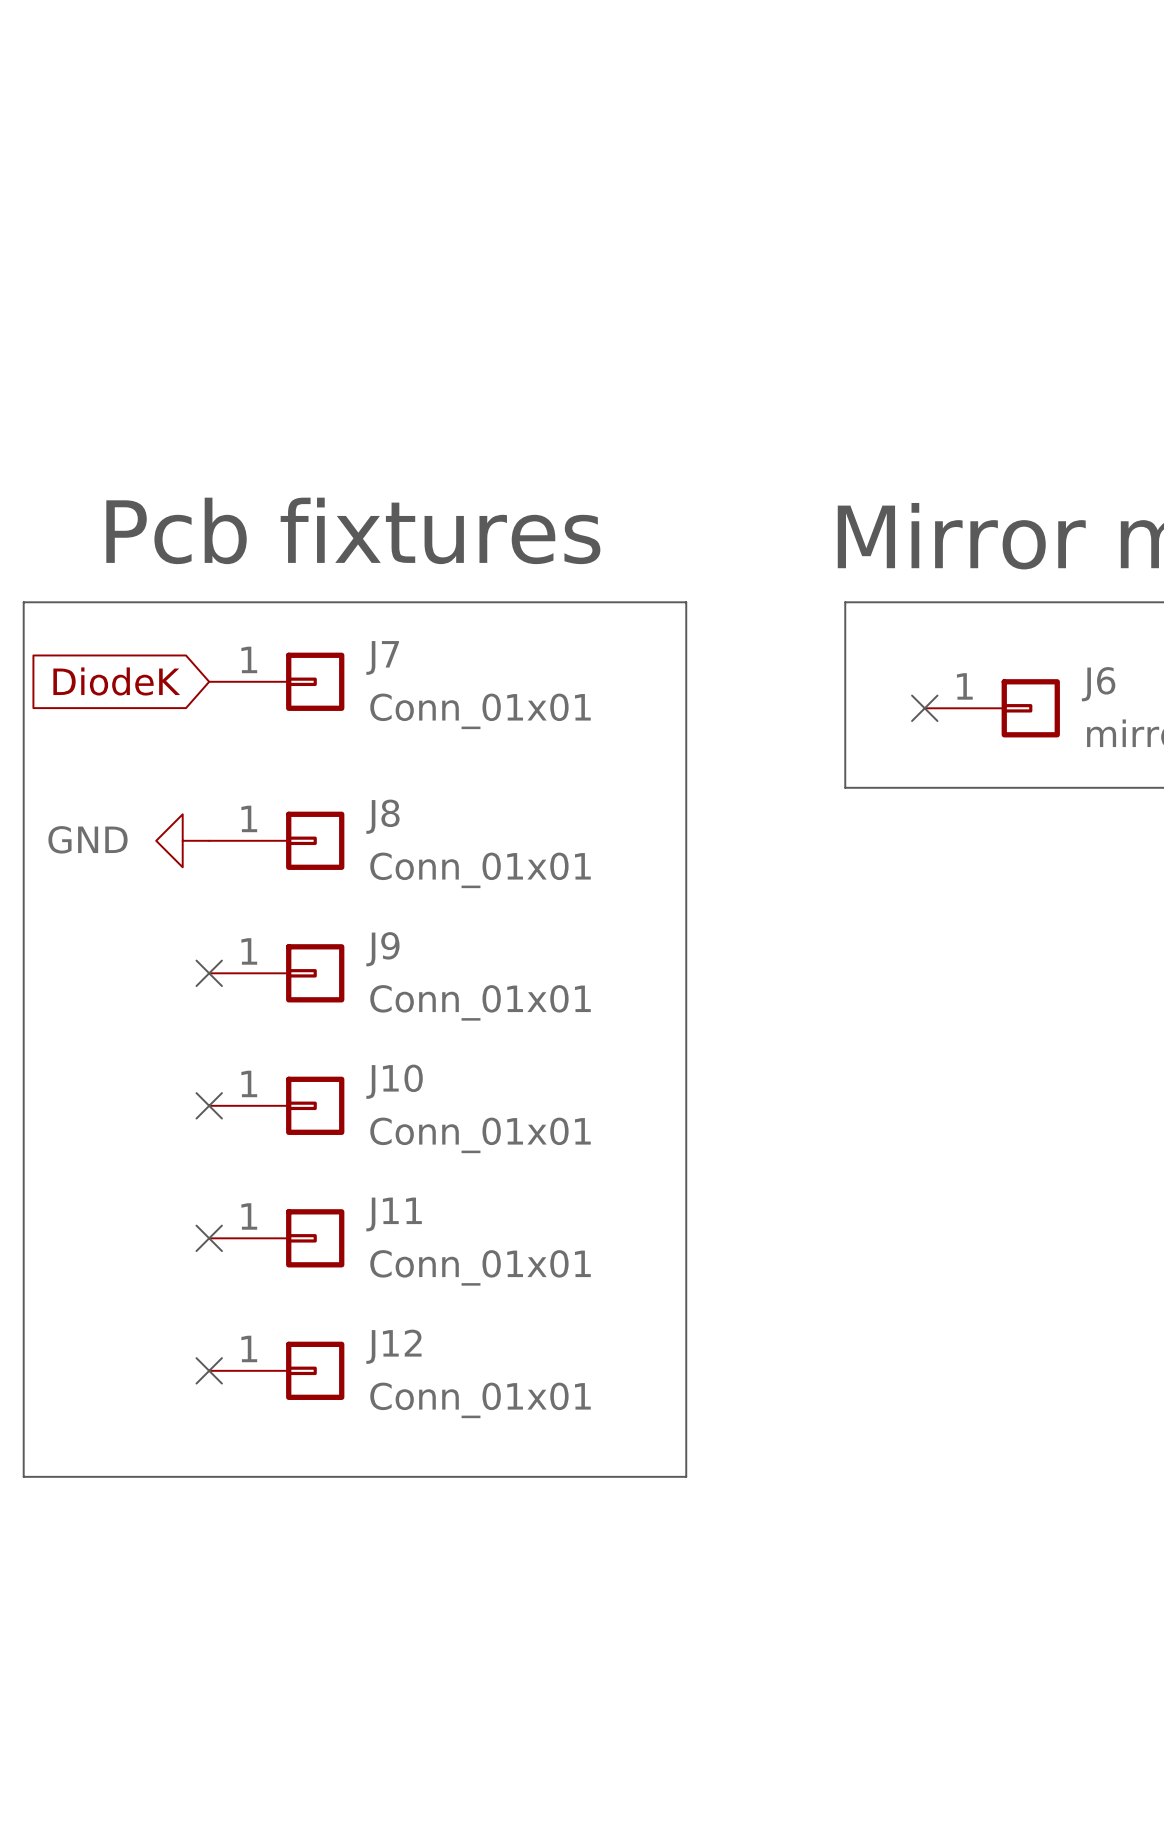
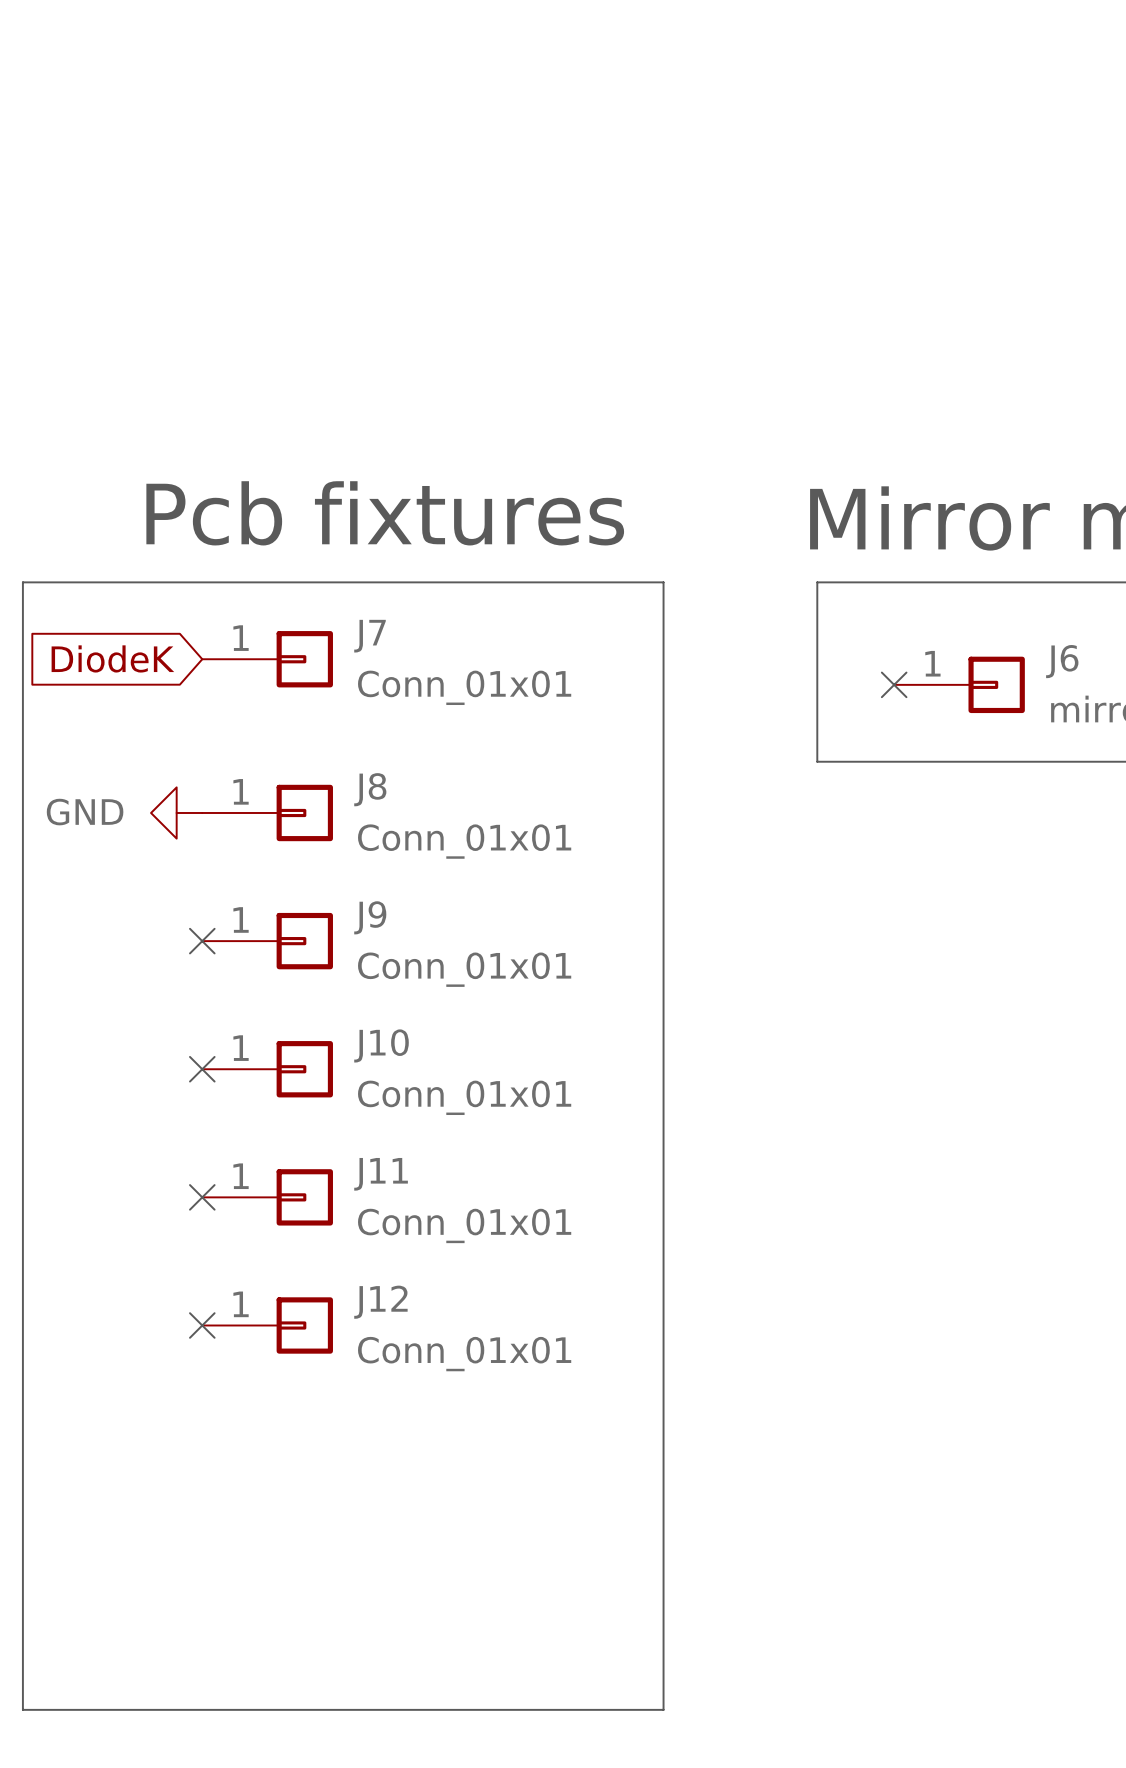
text position: Pcb fixtures (353, 530) -> Pcb fixtures (385, 513)
line: (23, 1476) (686, 1476) -> (22, 1427) (22, 1709) (663, 1709) (663, 1427)

